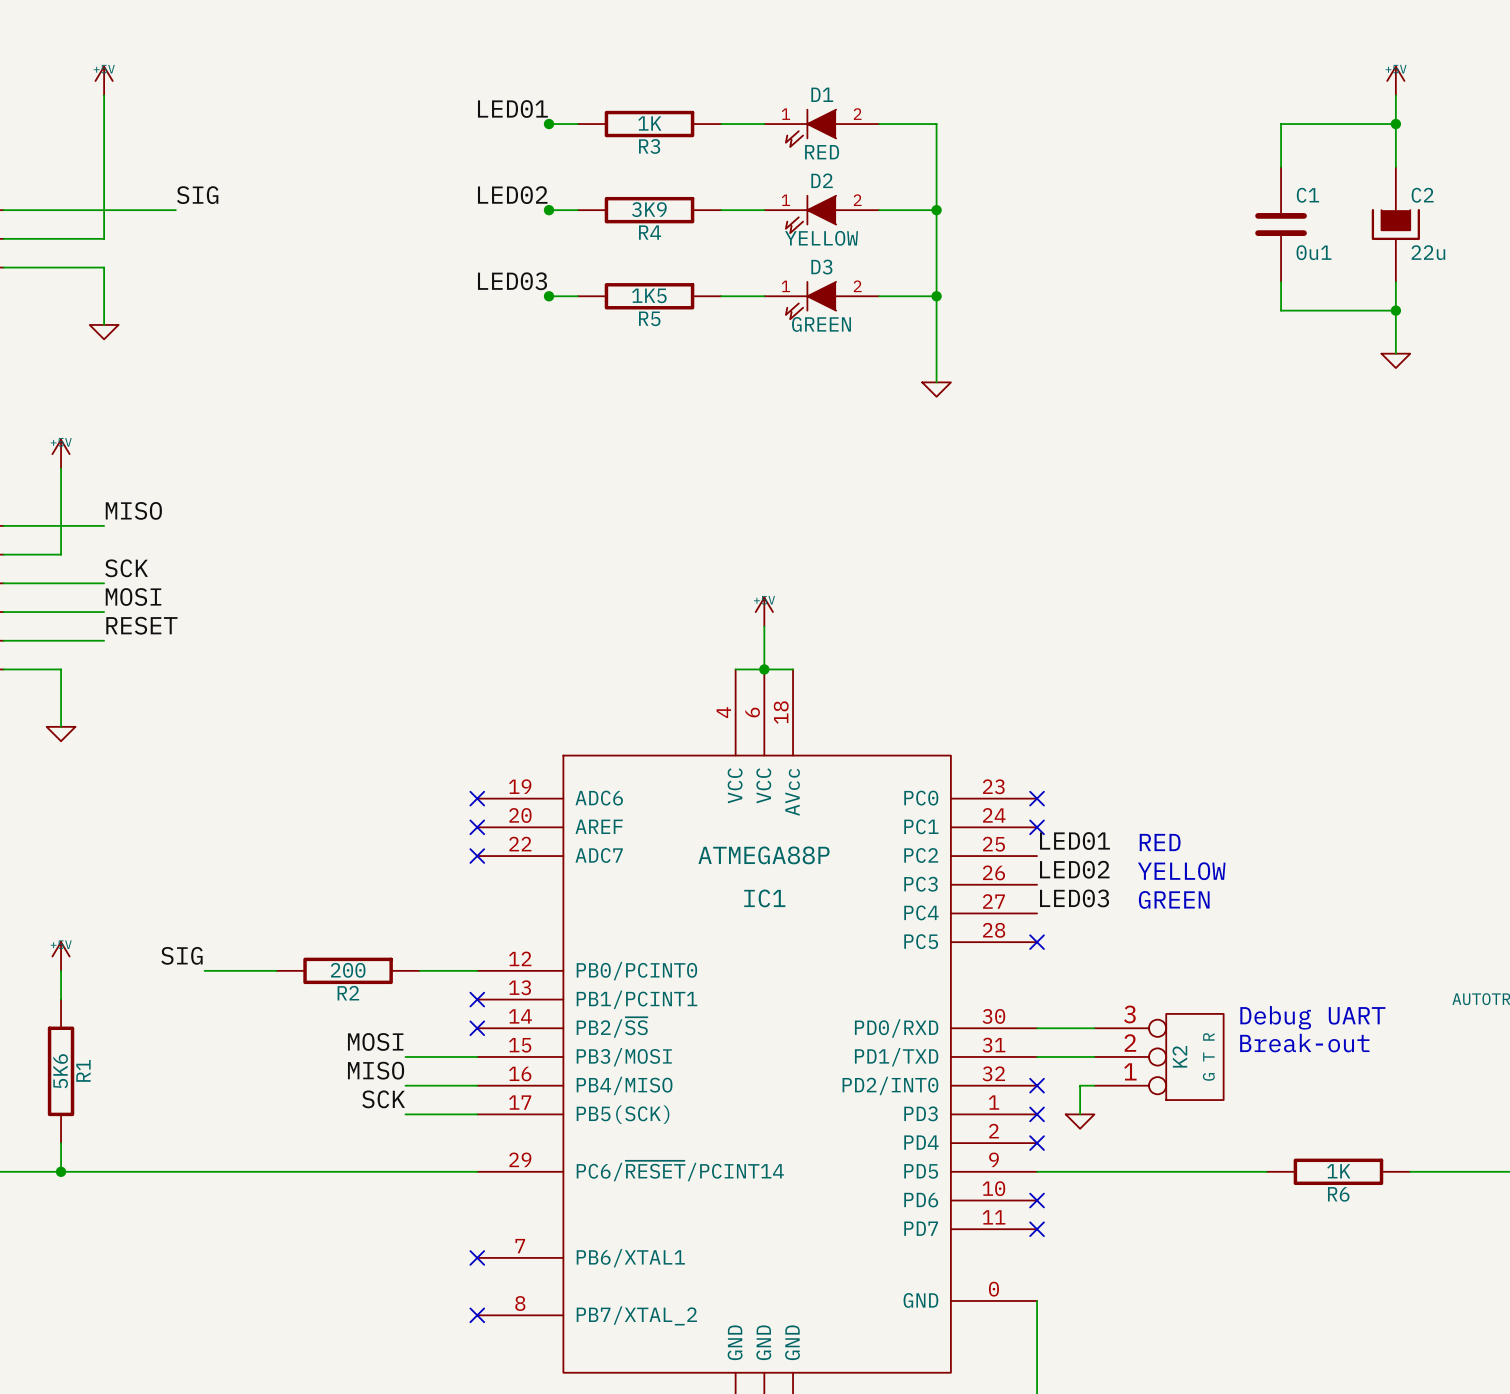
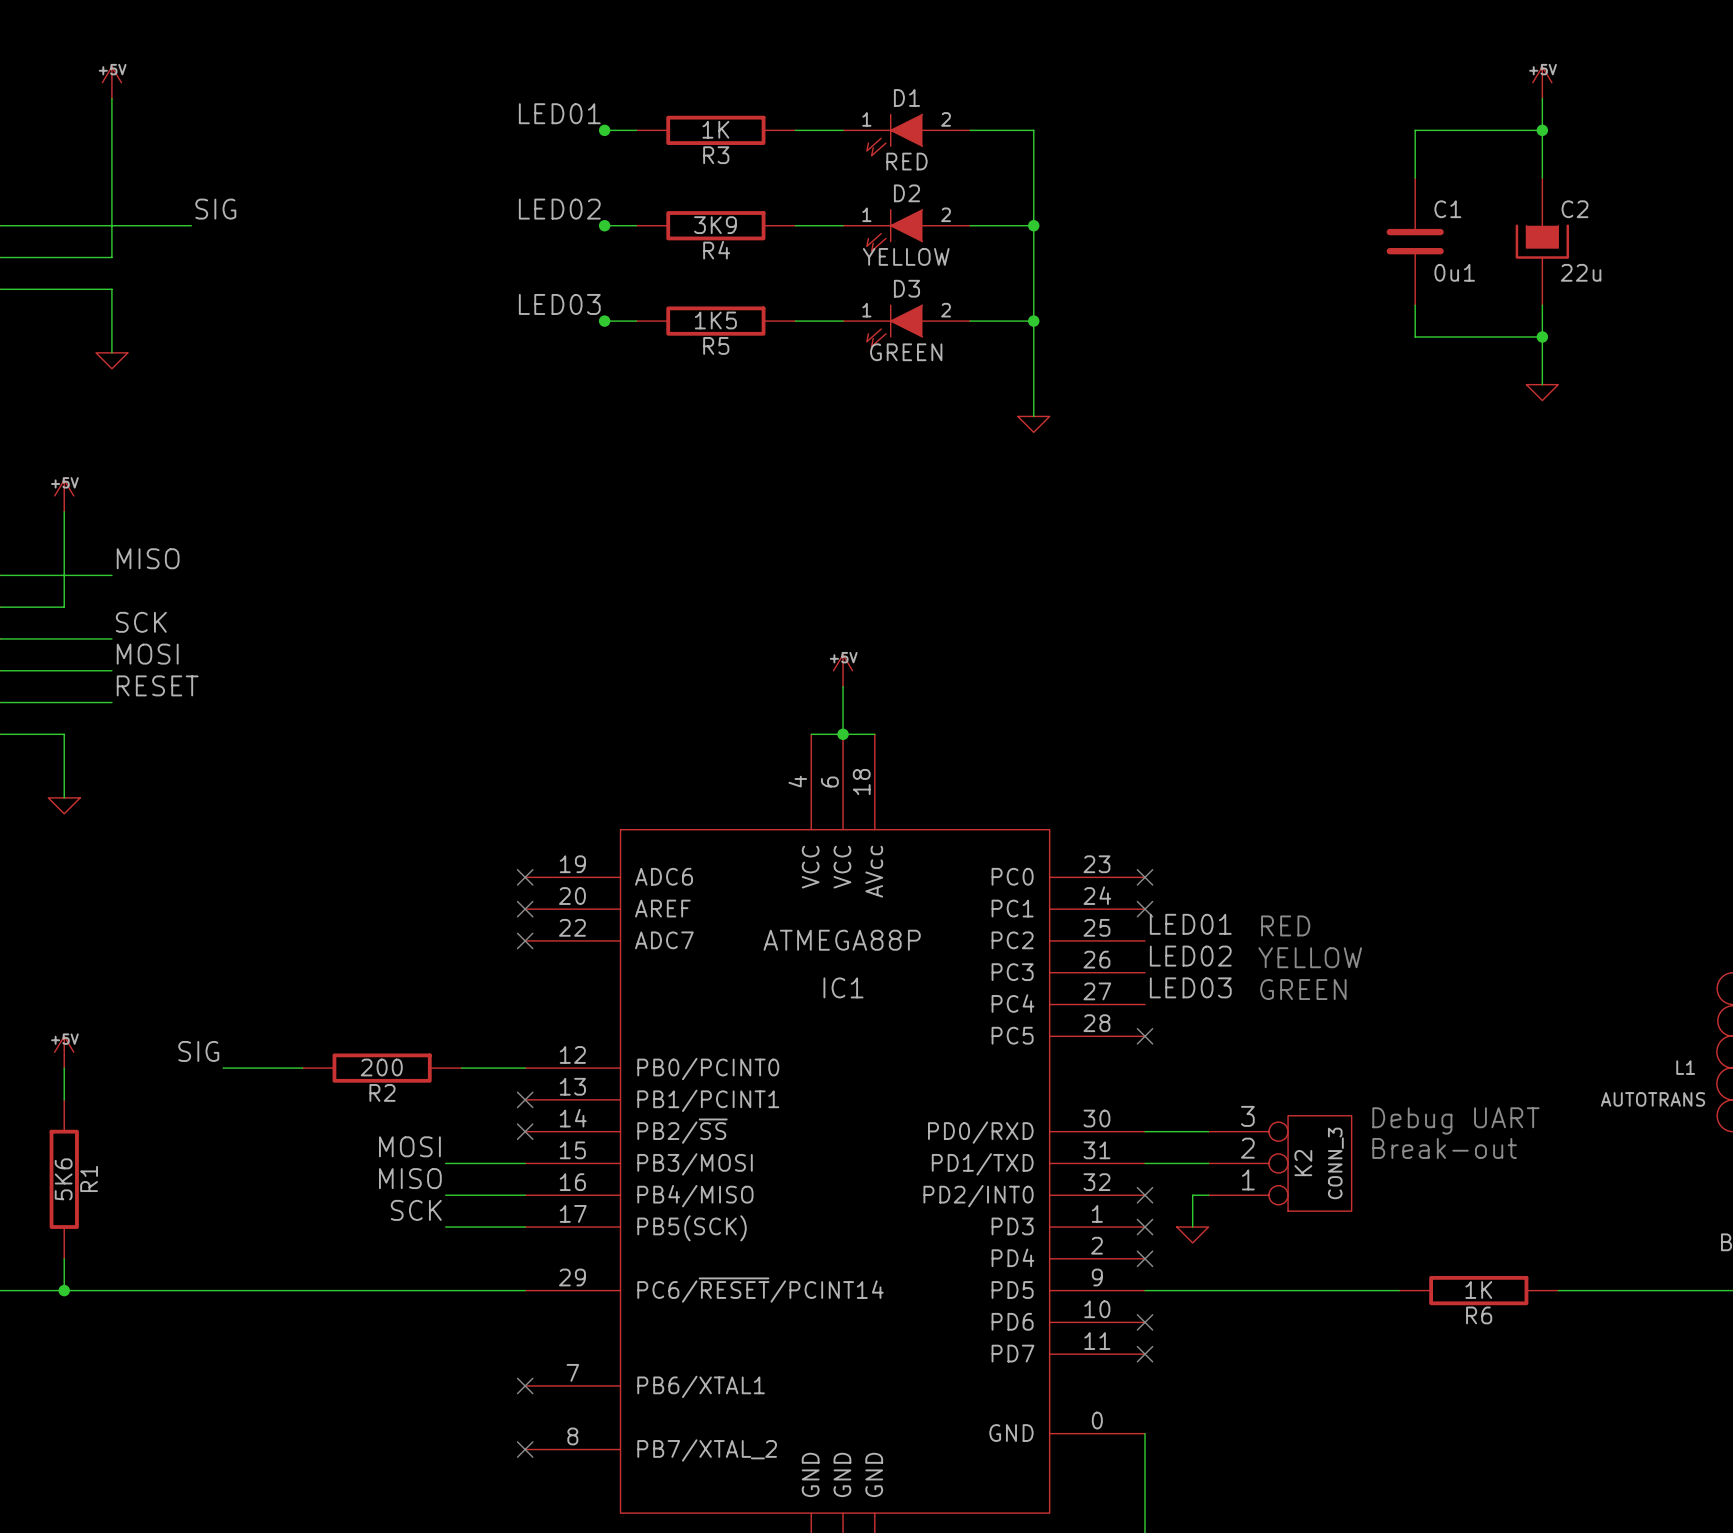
K2 value: G T R (1208, 1056) -> CONN_3 (1335, 1163)

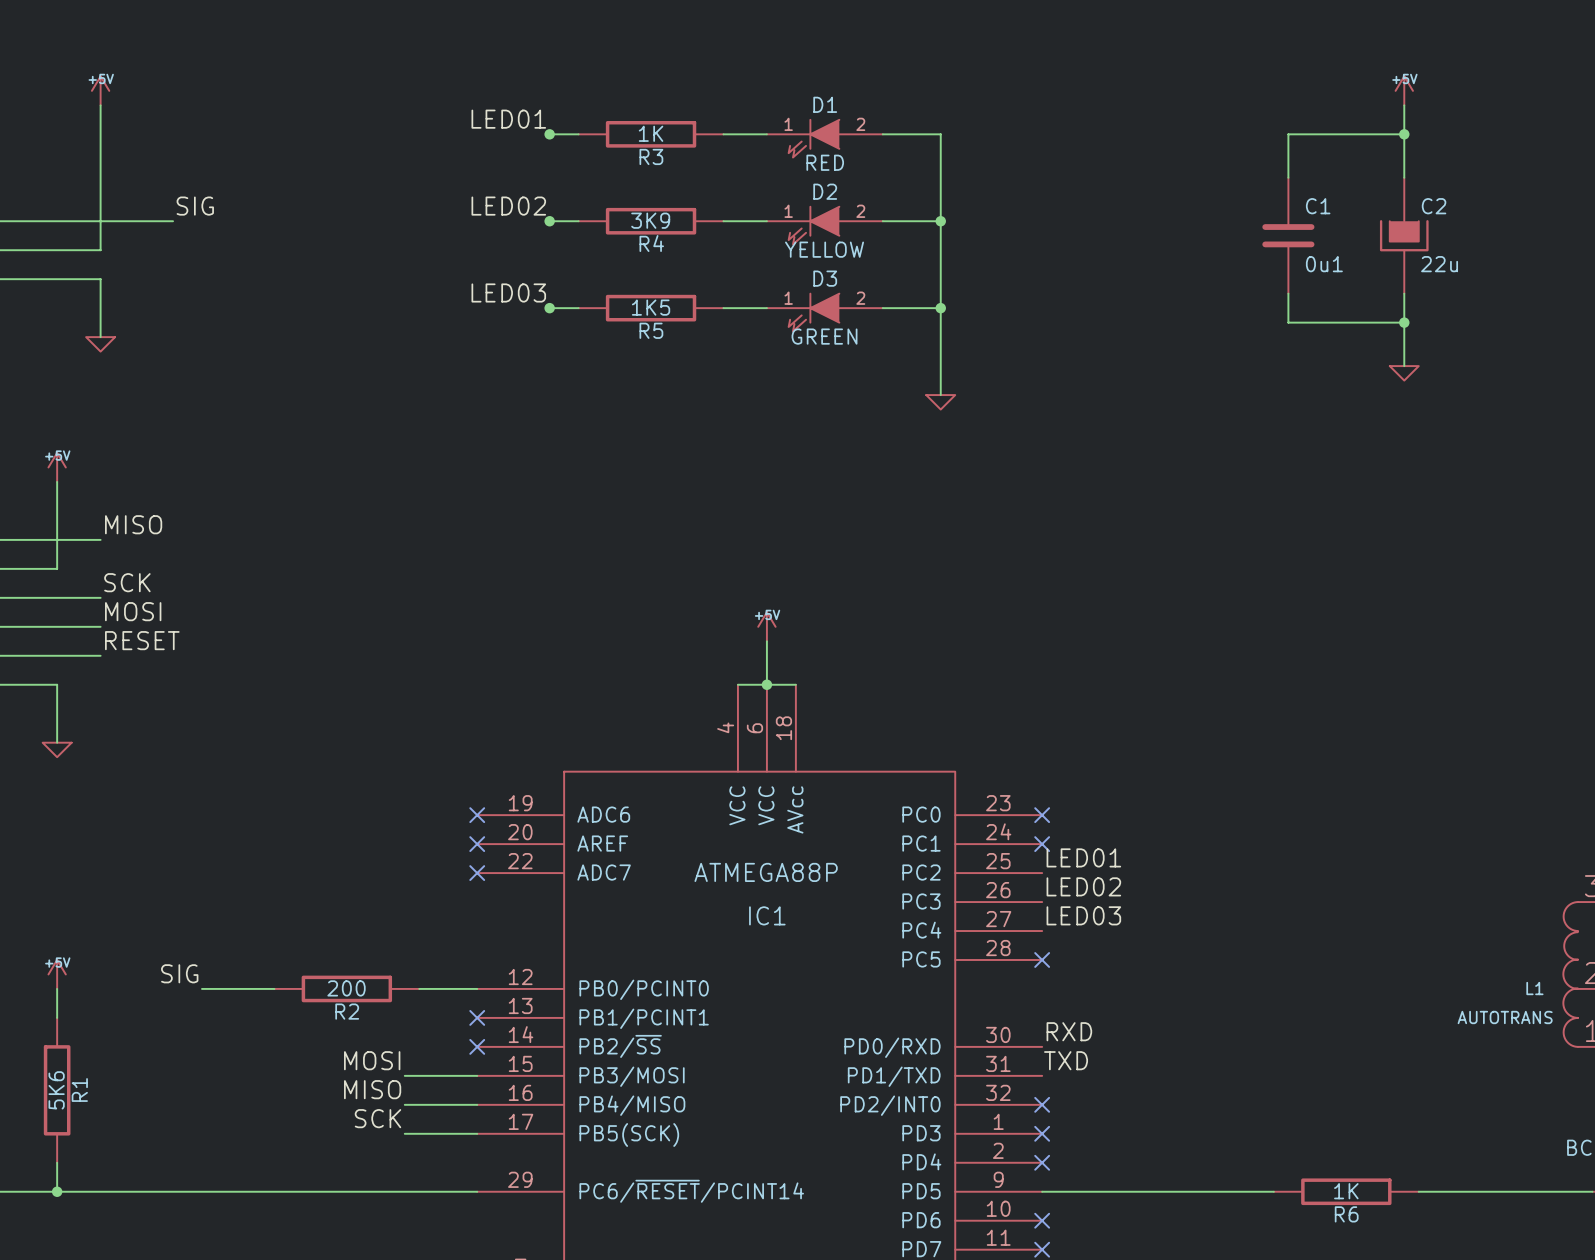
text: RED (1285, 925) -> none
text: YELLOW (1310, 957) -> none
text: GREEN (1303, 989) -> none
label: none -> RXD (1069, 1031)
text: Debug UART (1455, 1120) -> none
wire: (1145, 1131) (1208, 1131) -> none
label: none -> TXD (1066, 1060)
text: Break-out (1444, 1148) -> none
wire: (1145, 1163) (1208, 1163) -> none
K2: CONN_3 (1280, 1163) -> none
wire: (1208, 1195) (1192, 1195) (1192, 1227) -> none
power symbol: (1192, 1234) -> none

